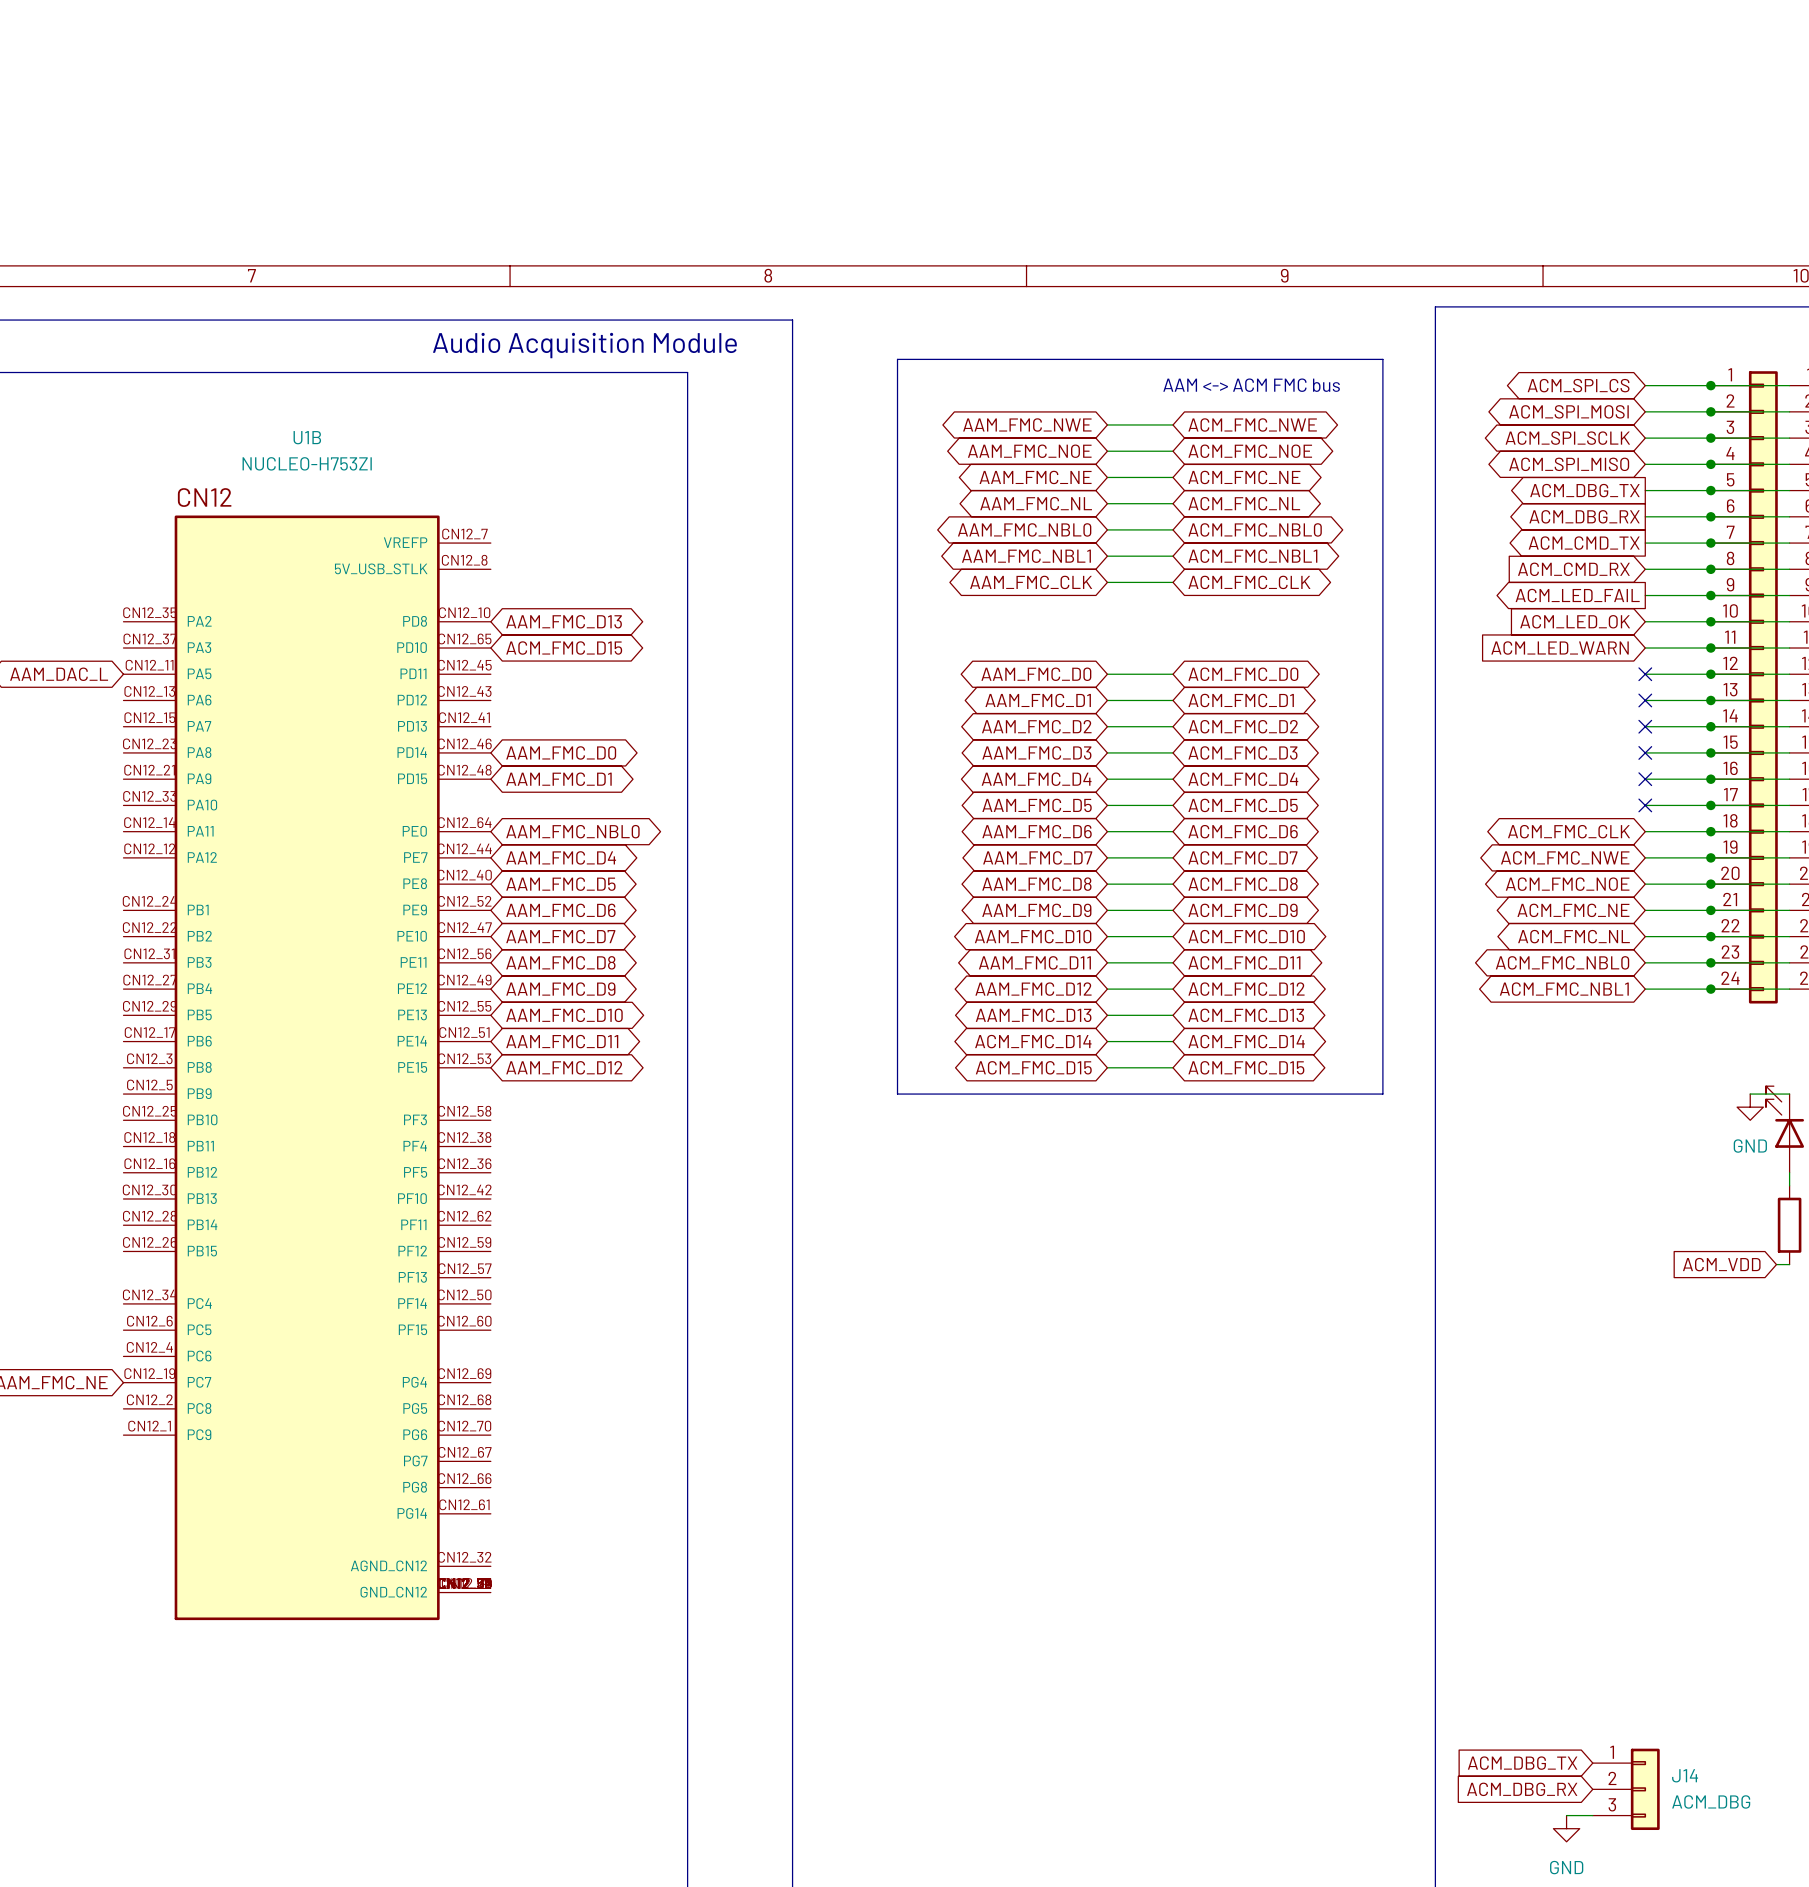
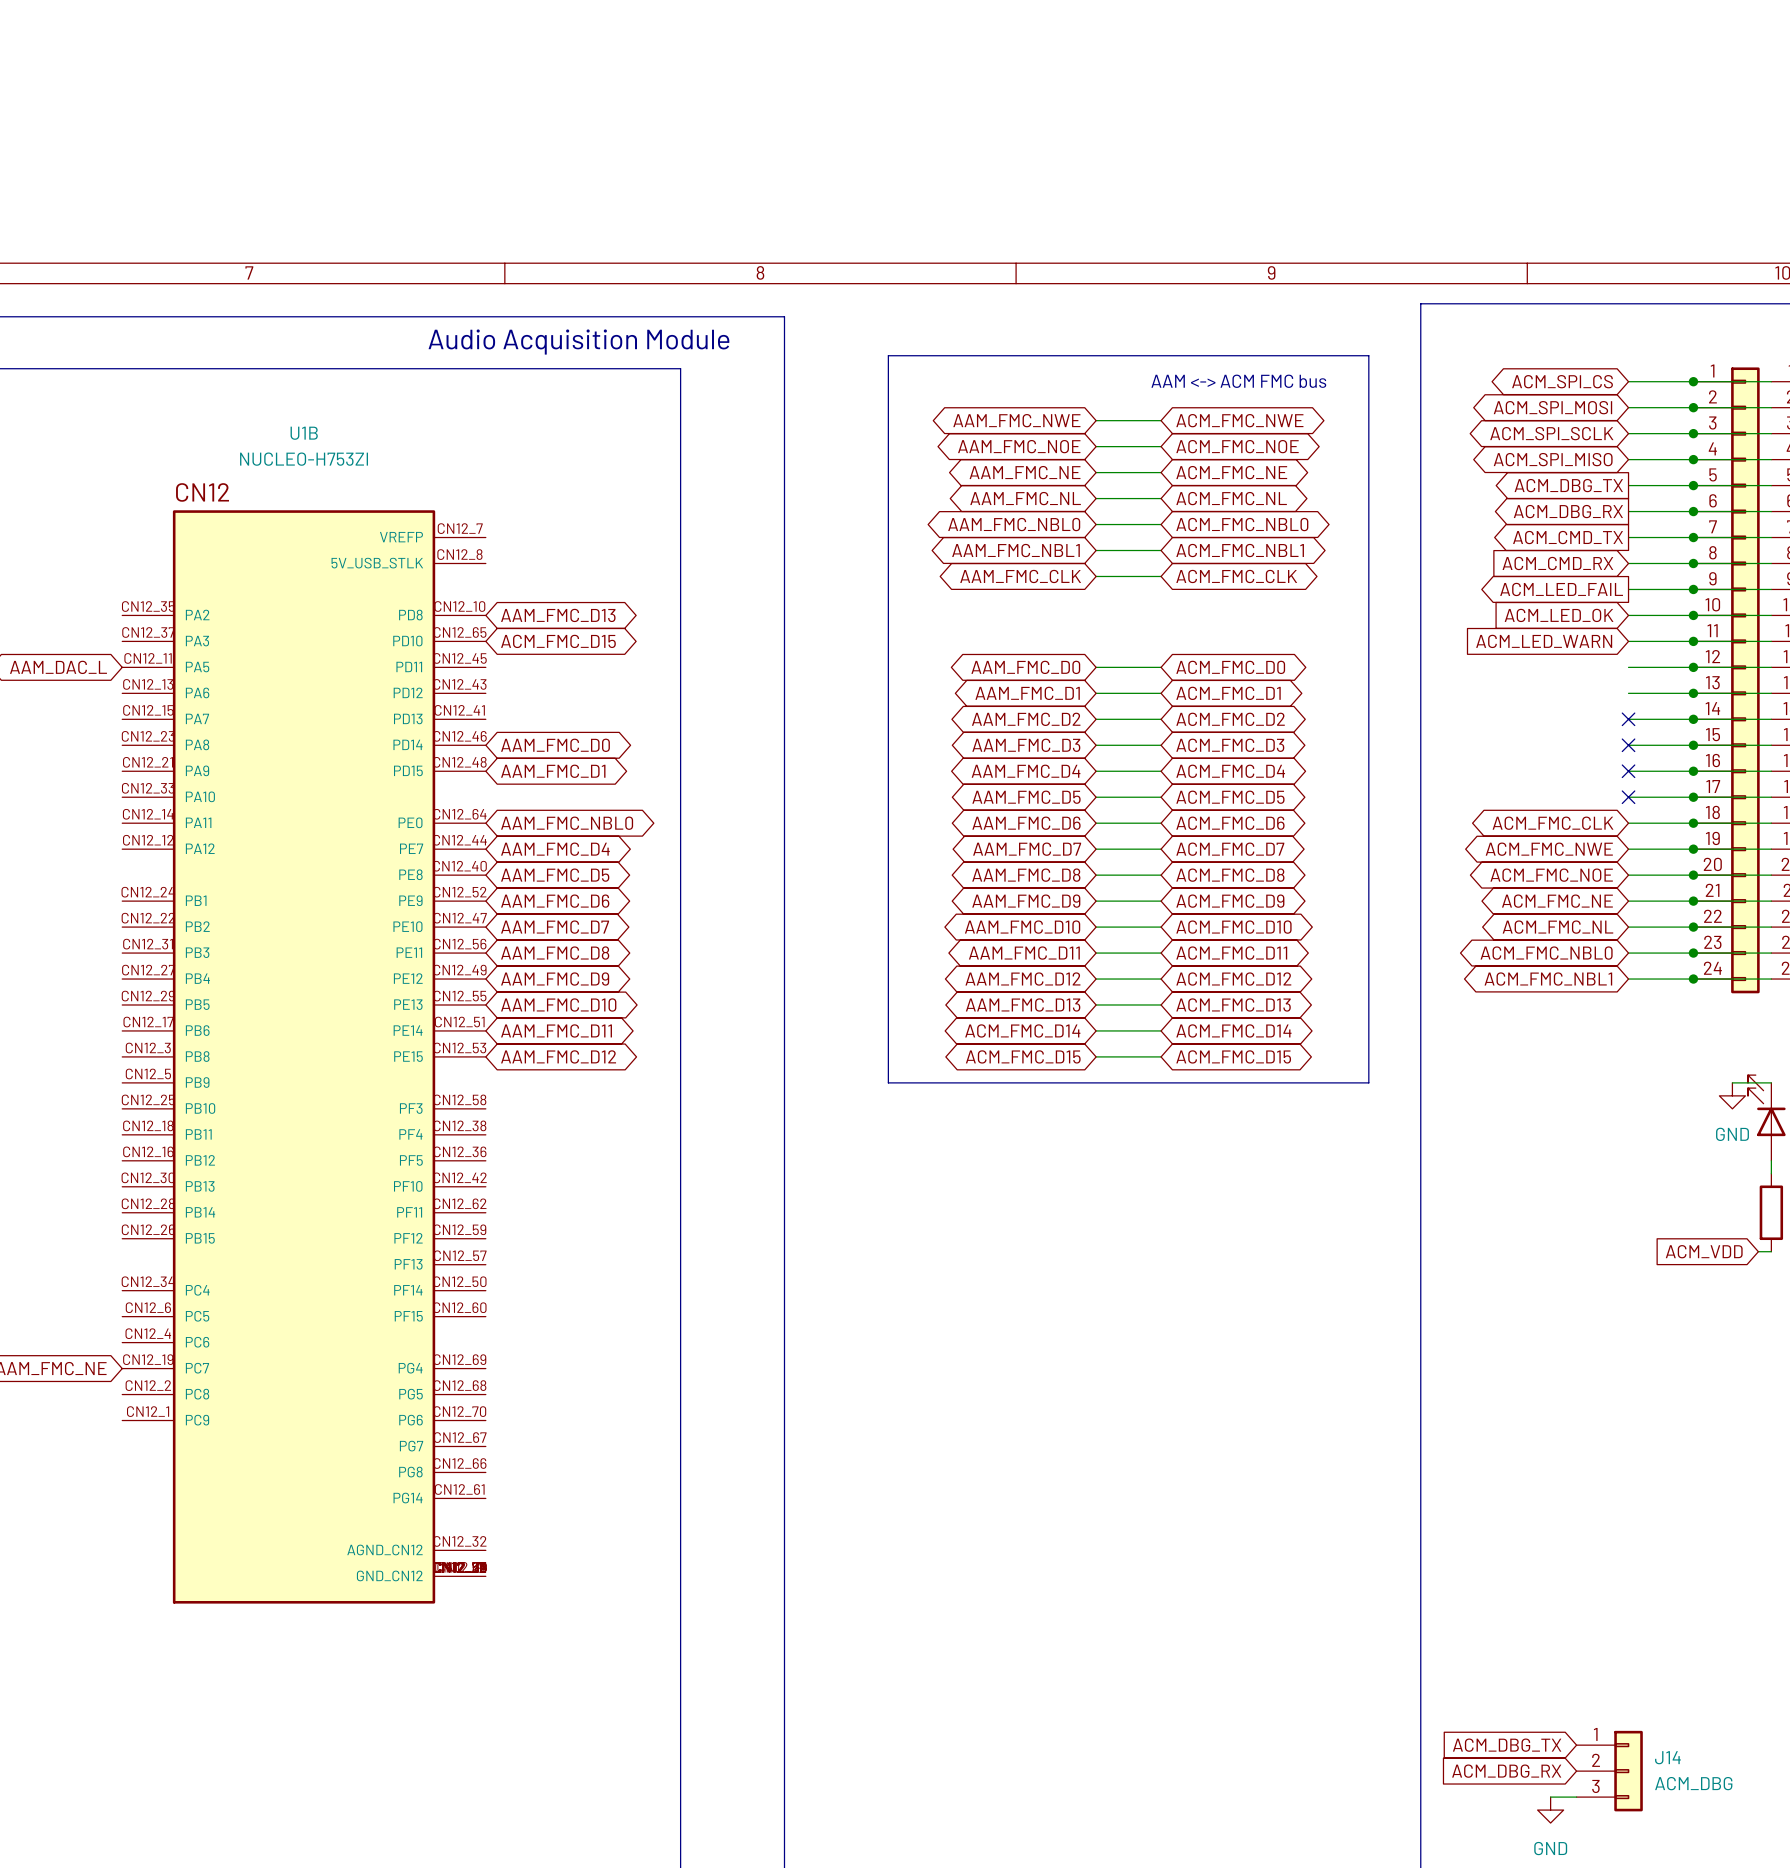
no-connect mark: (1645, 674) -> none
no-connect mark: (1645, 700) -> none

